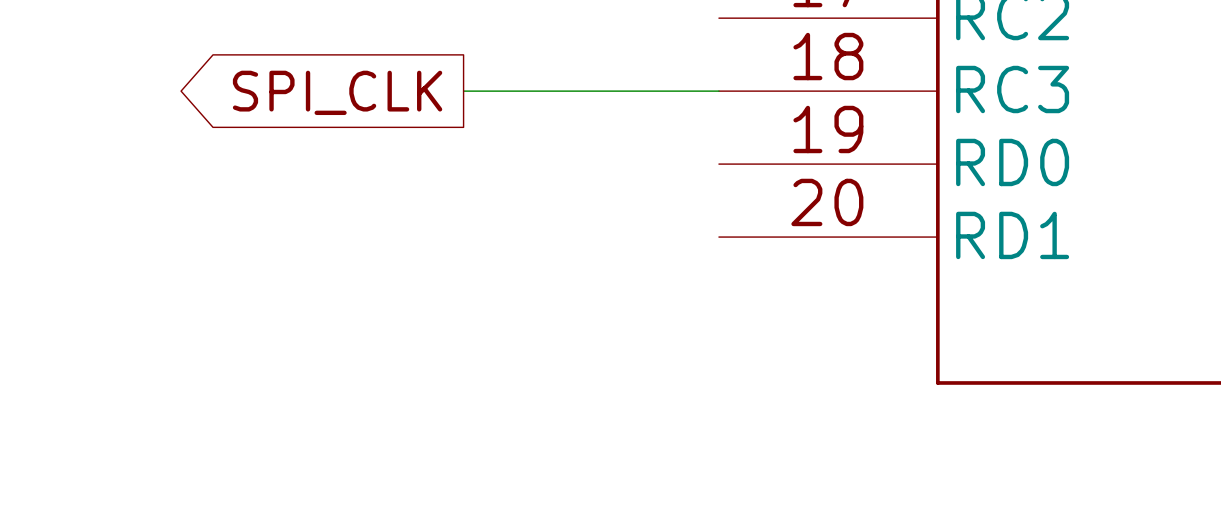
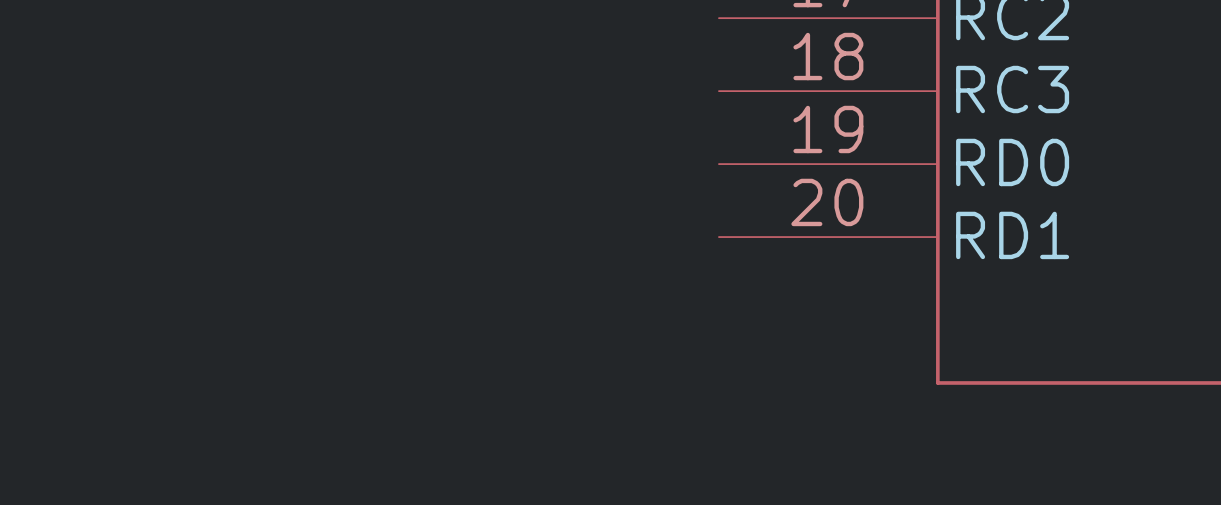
wire: (463, 91) (718, 91) -> none
global label: SPI_CLK (337, 92) -> none

